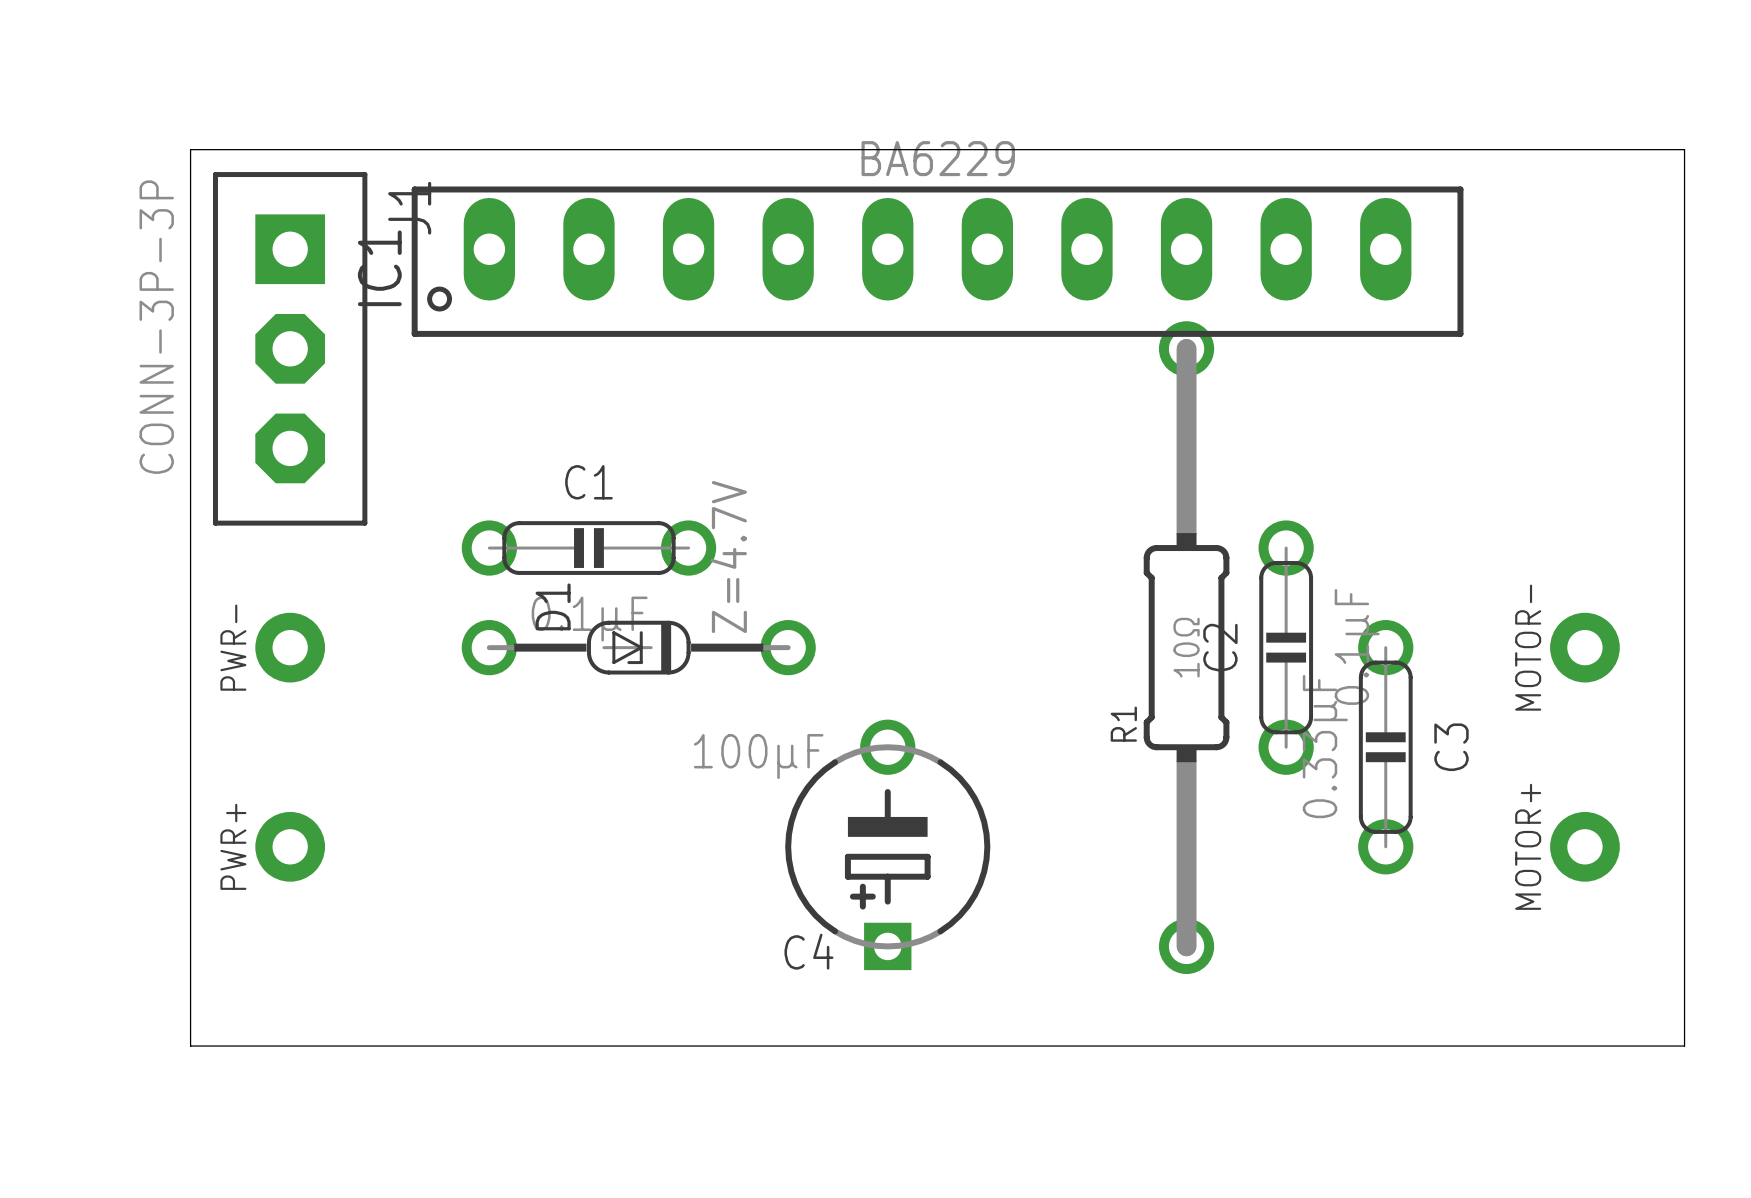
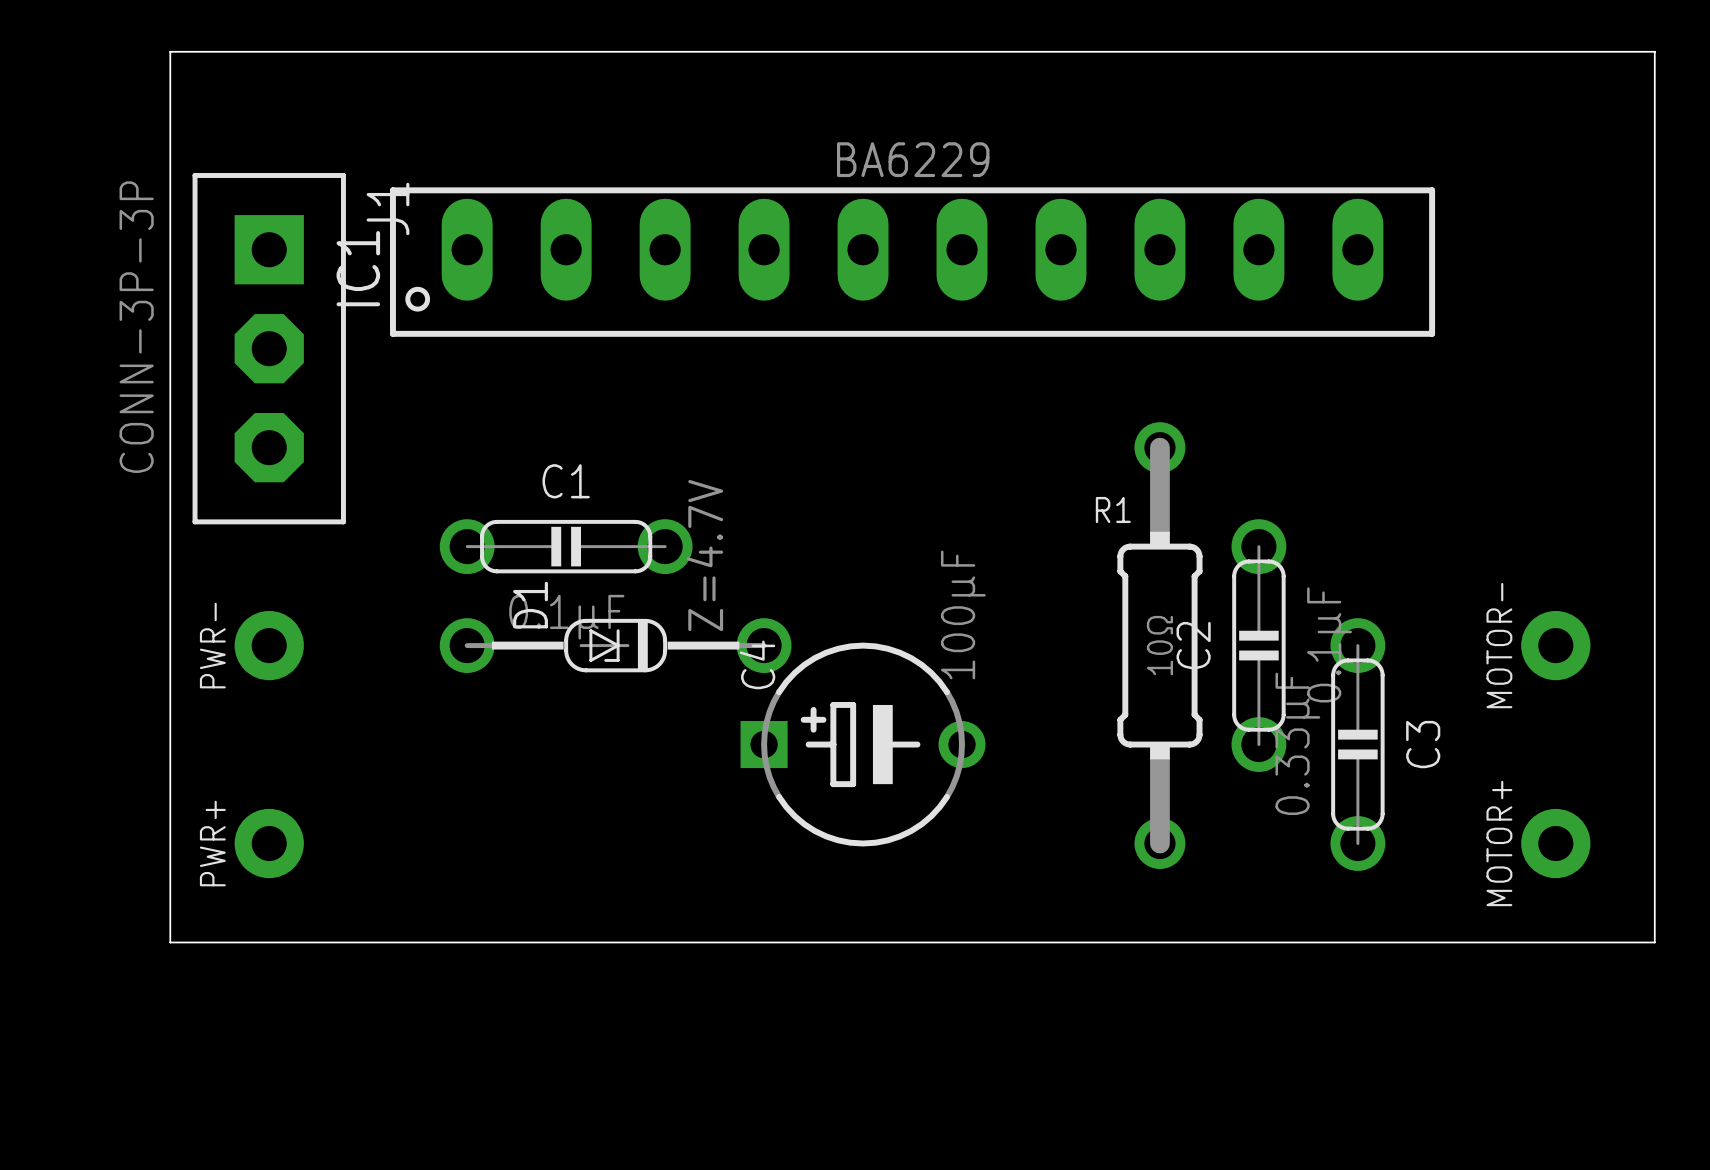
board edge: (190, 149) (1684, 149) -> (170, 150) (170, 51) (1654, 51) (1654, 150)
R1 footprint: [1143, 321, 1230, 975] -> [1117, 422, 1203, 870]
C4 footprint: [785, 719, 991, 971] -> [740, 642, 986, 847]
R1 name position: R1 (1123, 724) -> R1 (1113, 510)
C4 value position: 100μF (758, 756) -> 100μF (963, 614)
board edge: (190, 946) (190, 1046) (1684, 1046) (1684, 946) -> (170, 942) (1654, 942)
C4 name position: C4 (808, 951) -> C4 (757, 664)

